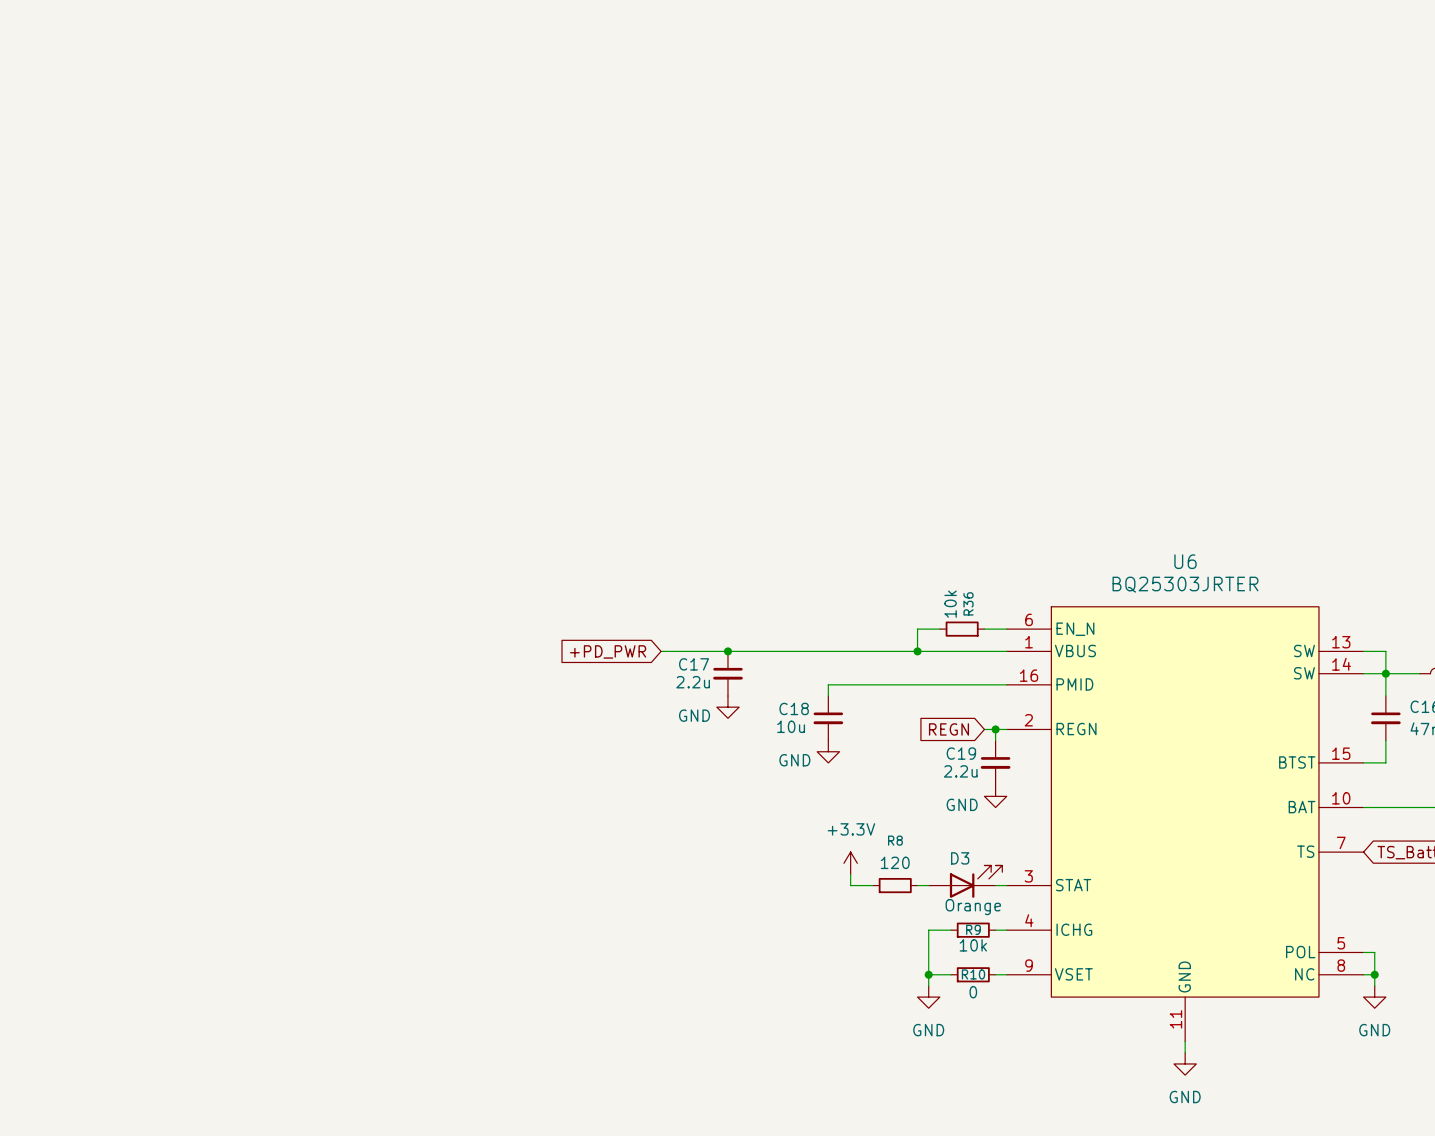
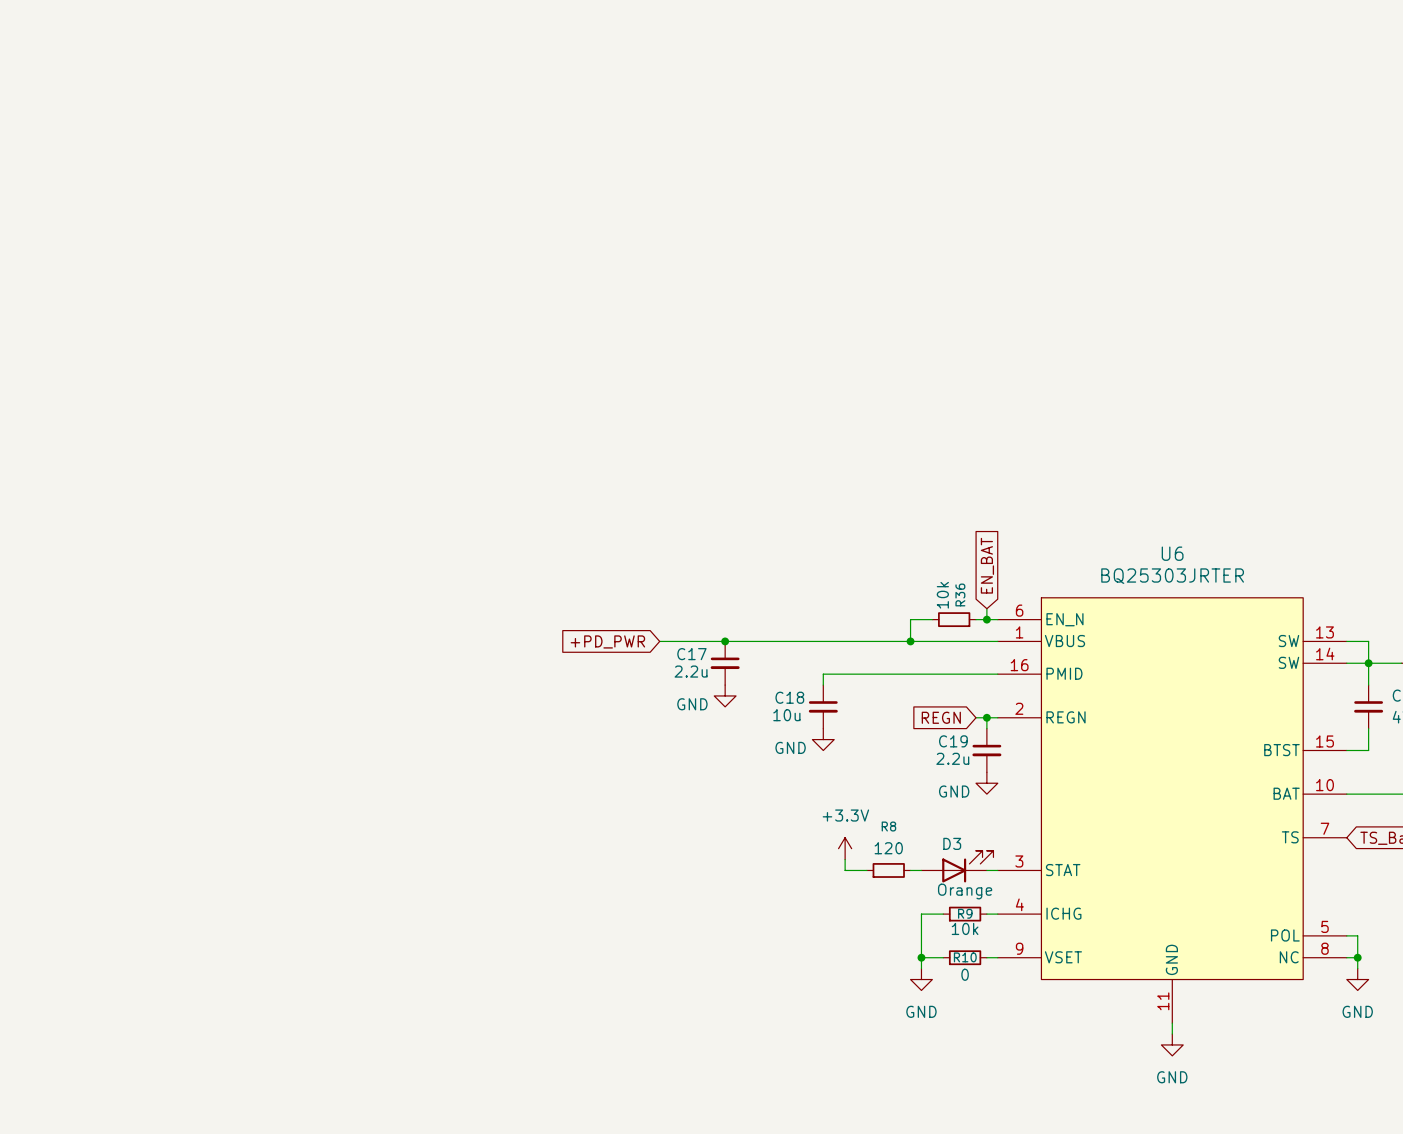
global label: none -> EN_BAT (987, 565)
wire: none -> (986, 608) (986, 619)
junction: none -> (986, 619)

